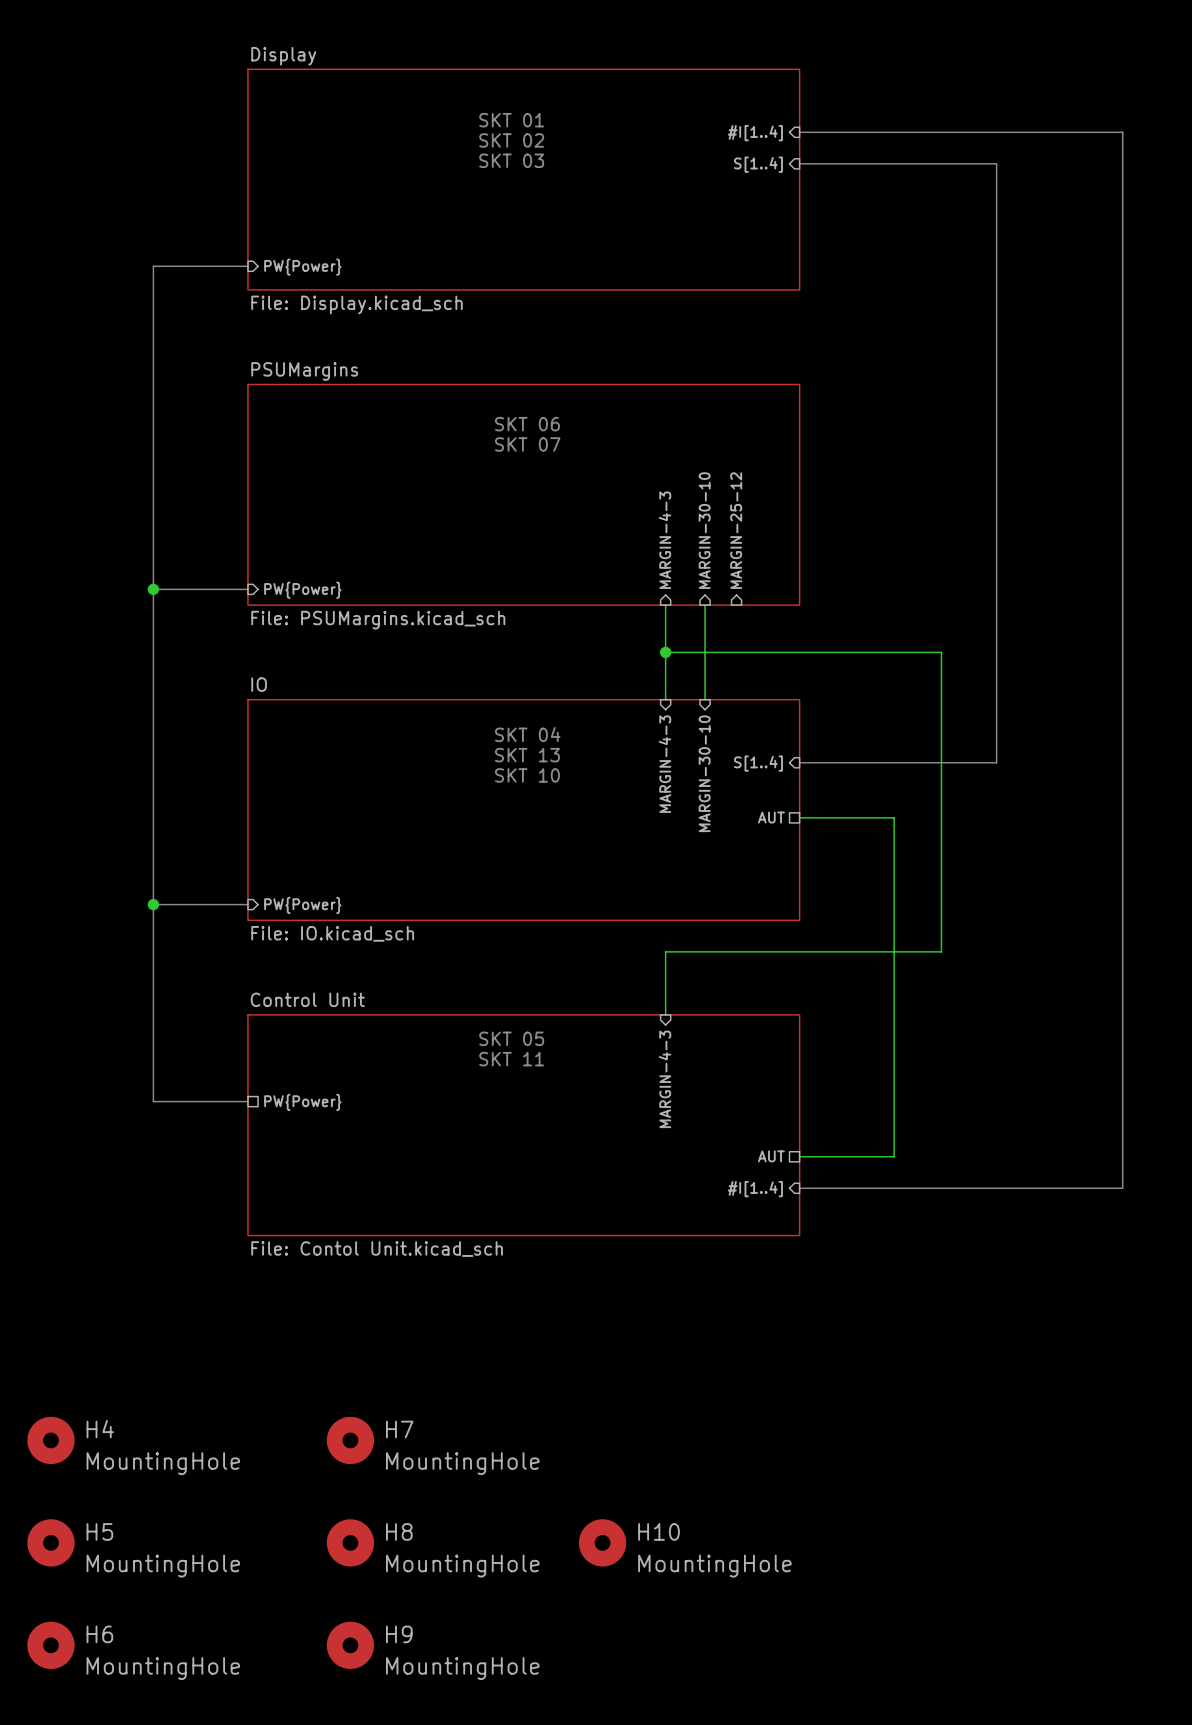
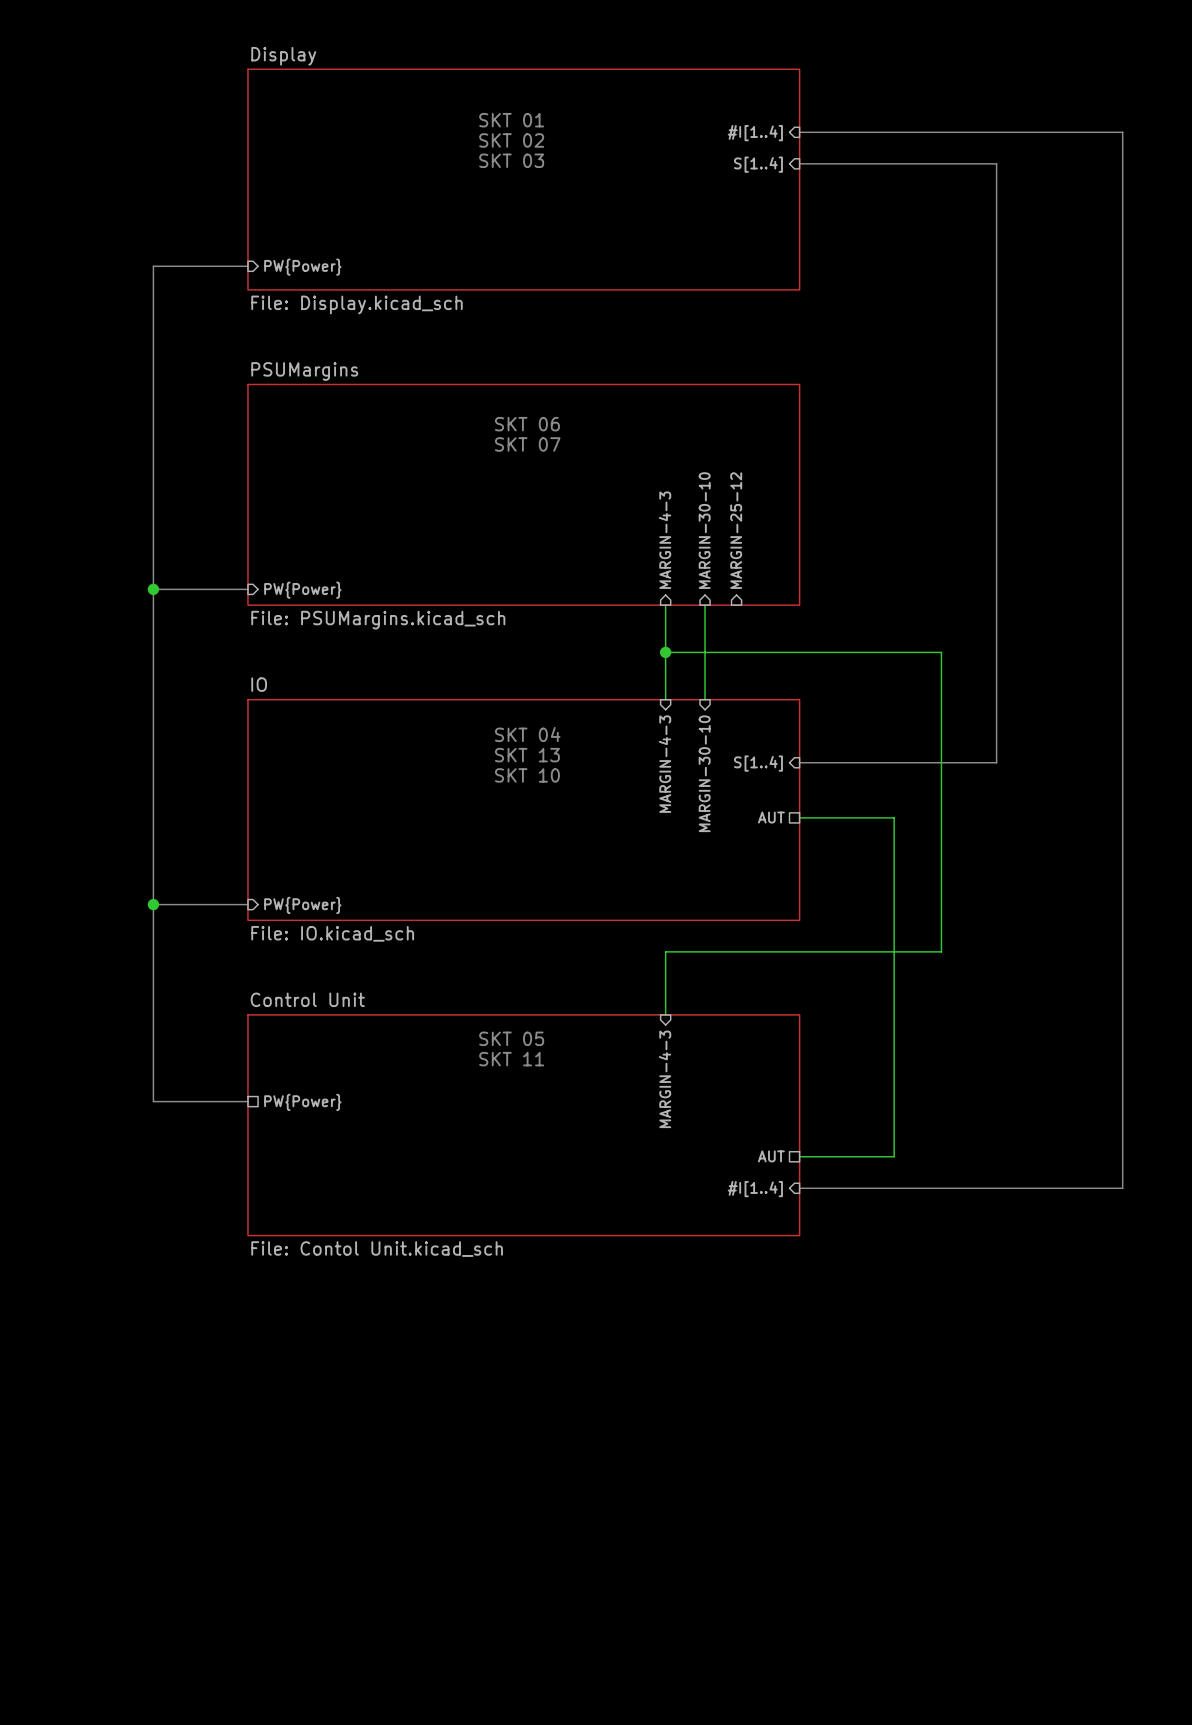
H4: MountingHole (50, 1440) -> none
H7: MountingHole (350, 1440) -> none
H5: MountingHole (50, 1542) -> none
H8: MountingHole (350, 1542) -> none
H10: MountingHole (602, 1542) -> none
H6: MountingHole (50, 1645) -> none
H9: MountingHole (350, 1645) -> none

